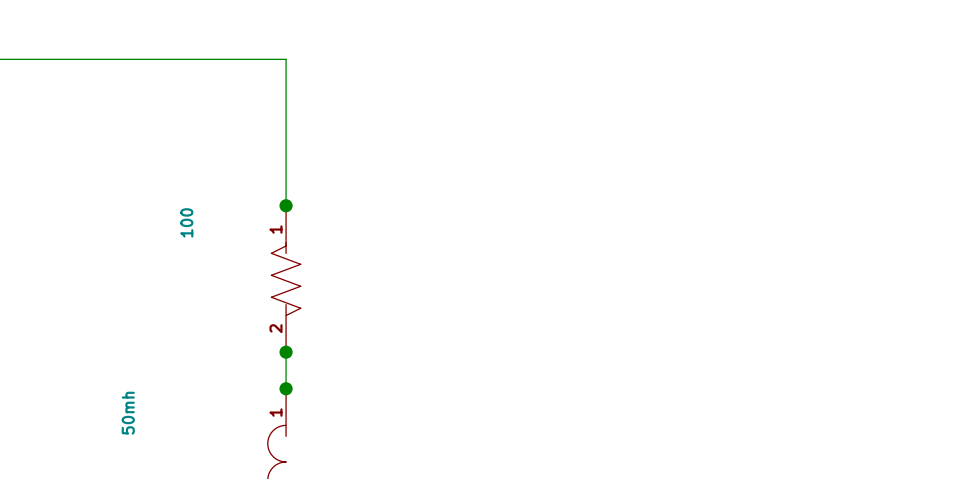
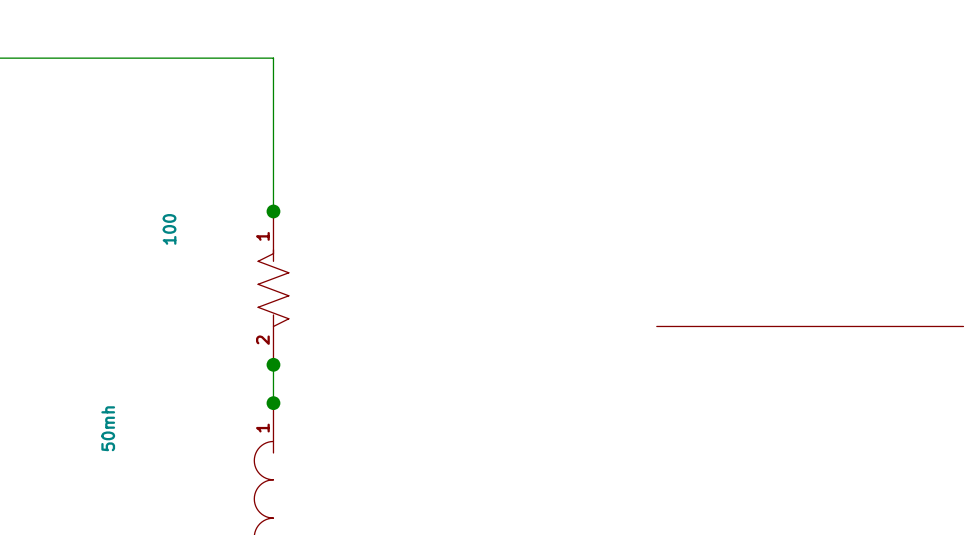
part: none -> (810, 326)

